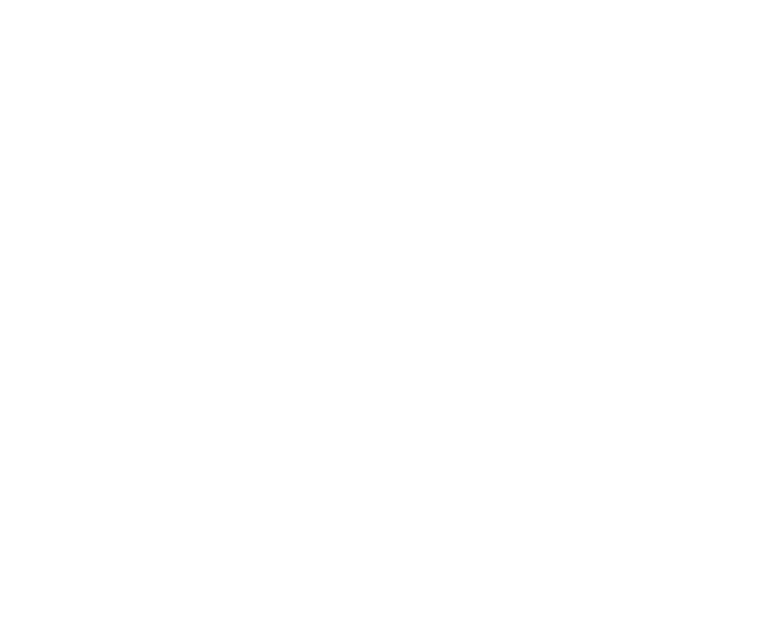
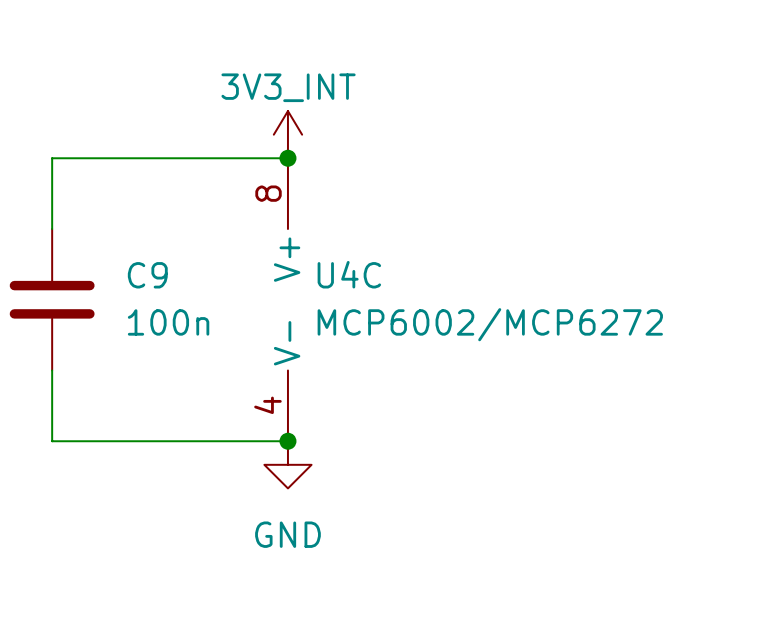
power symbol: none -> 3V3_INT (287, 134)
wire: none -> (287, 158) (52, 158) (52, 229)
junction: none -> (287, 158)
C9: none -> 100n (52, 299)
U4C: none -> MCP6002/MCP6272 (287, 299)
wire: none -> (52, 370) (52, 441) (287, 441)
junction: none -> (287, 441)
power symbol: none -> GND (287, 464)

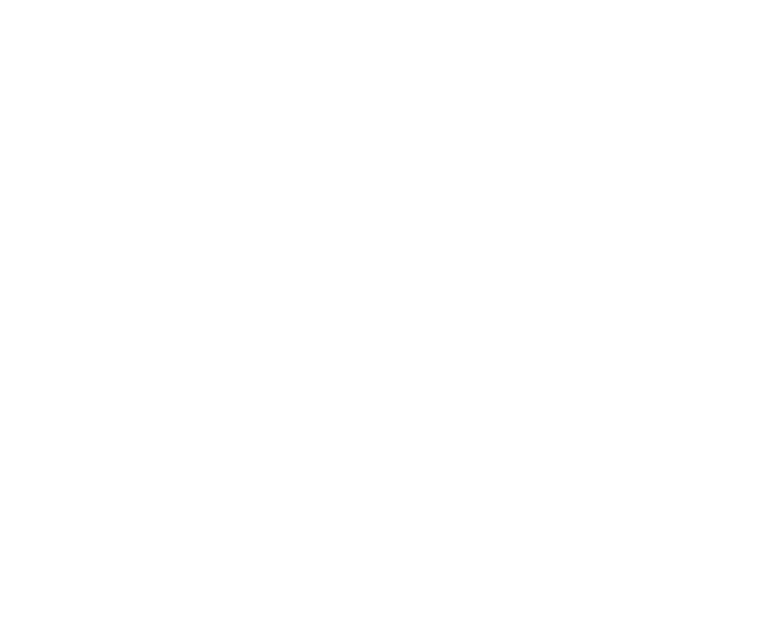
power symbol: 3V3_INT (287, 134) -> none
wire: (287, 158) (52, 158) (52, 229) -> none
junction: (287, 158) -> none
C9: 100n (52, 299) -> none
U4C: MCP6002/MCP6272 (287, 299) -> none
wire: (52, 370) (52, 441) (287, 441) -> none
junction: (287, 441) -> none
power symbol: GND (287, 464) -> none

